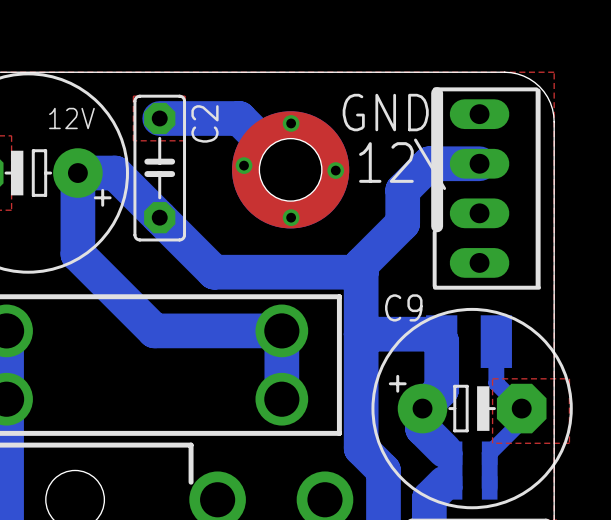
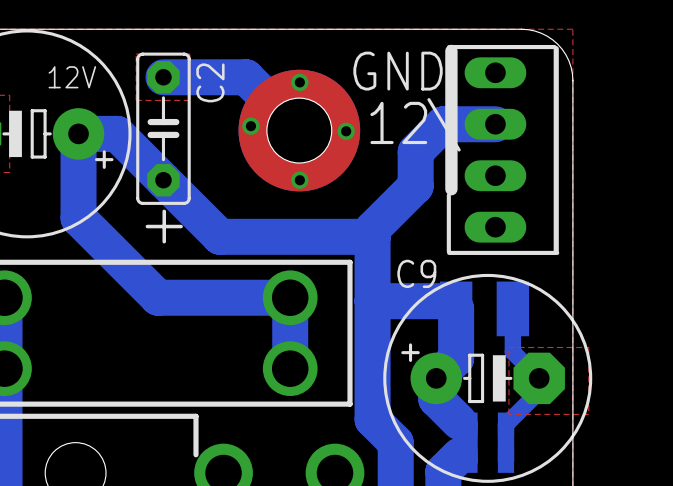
text: none -> + (164, 226)

